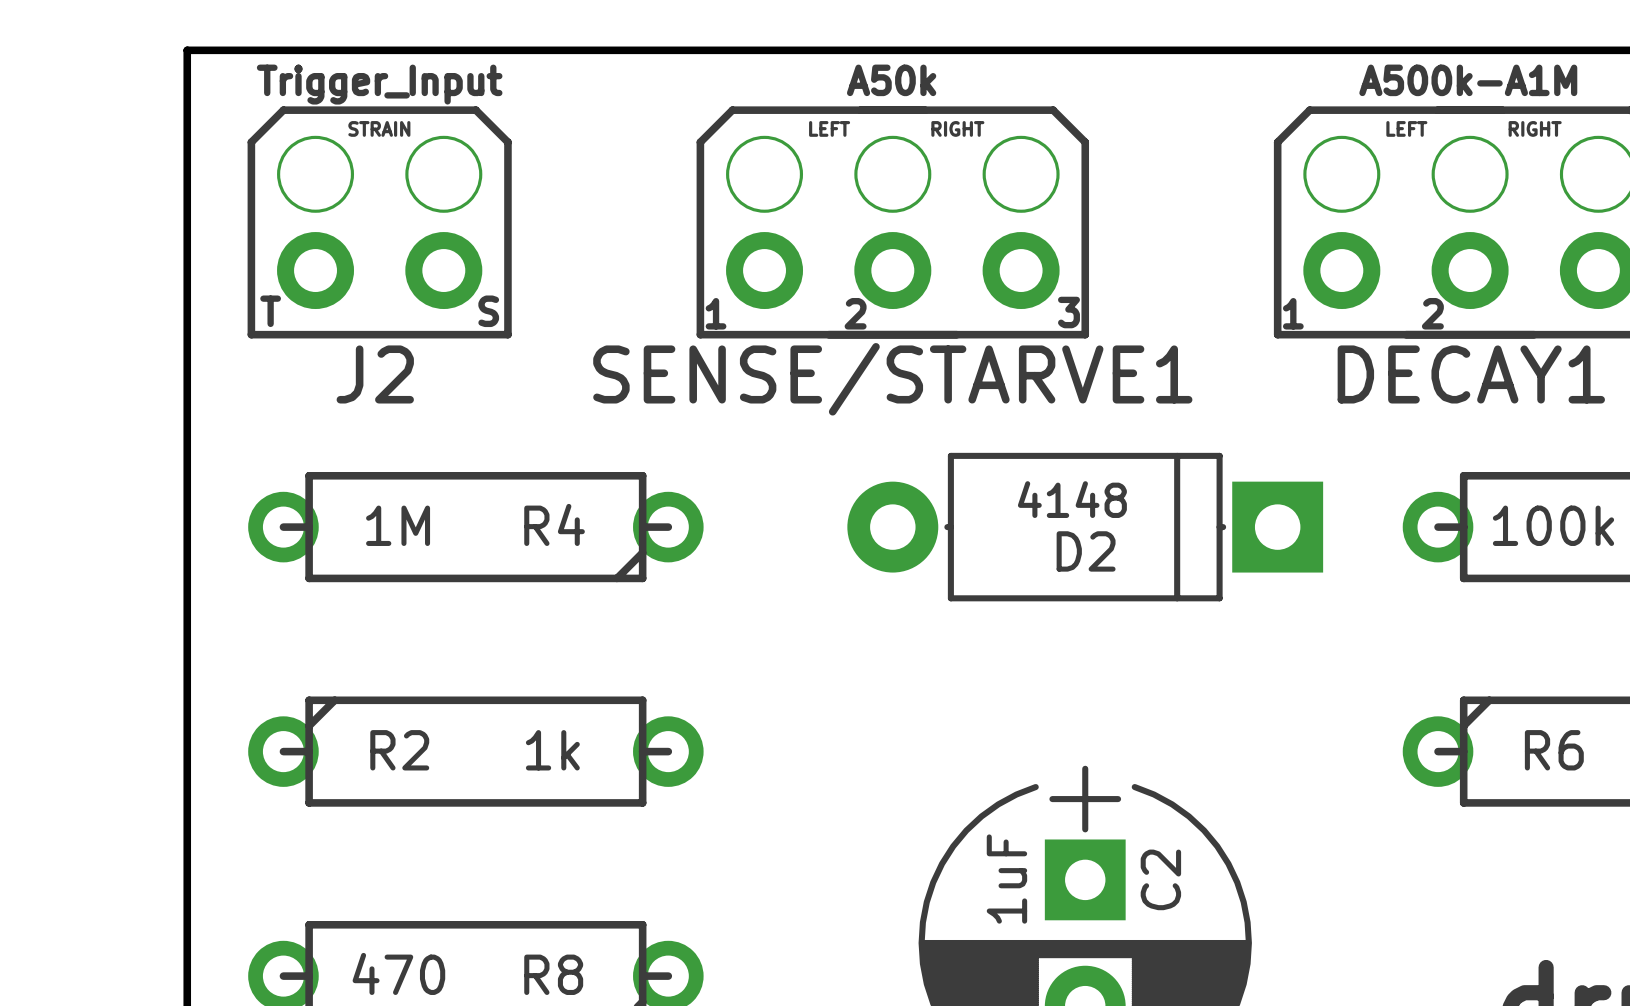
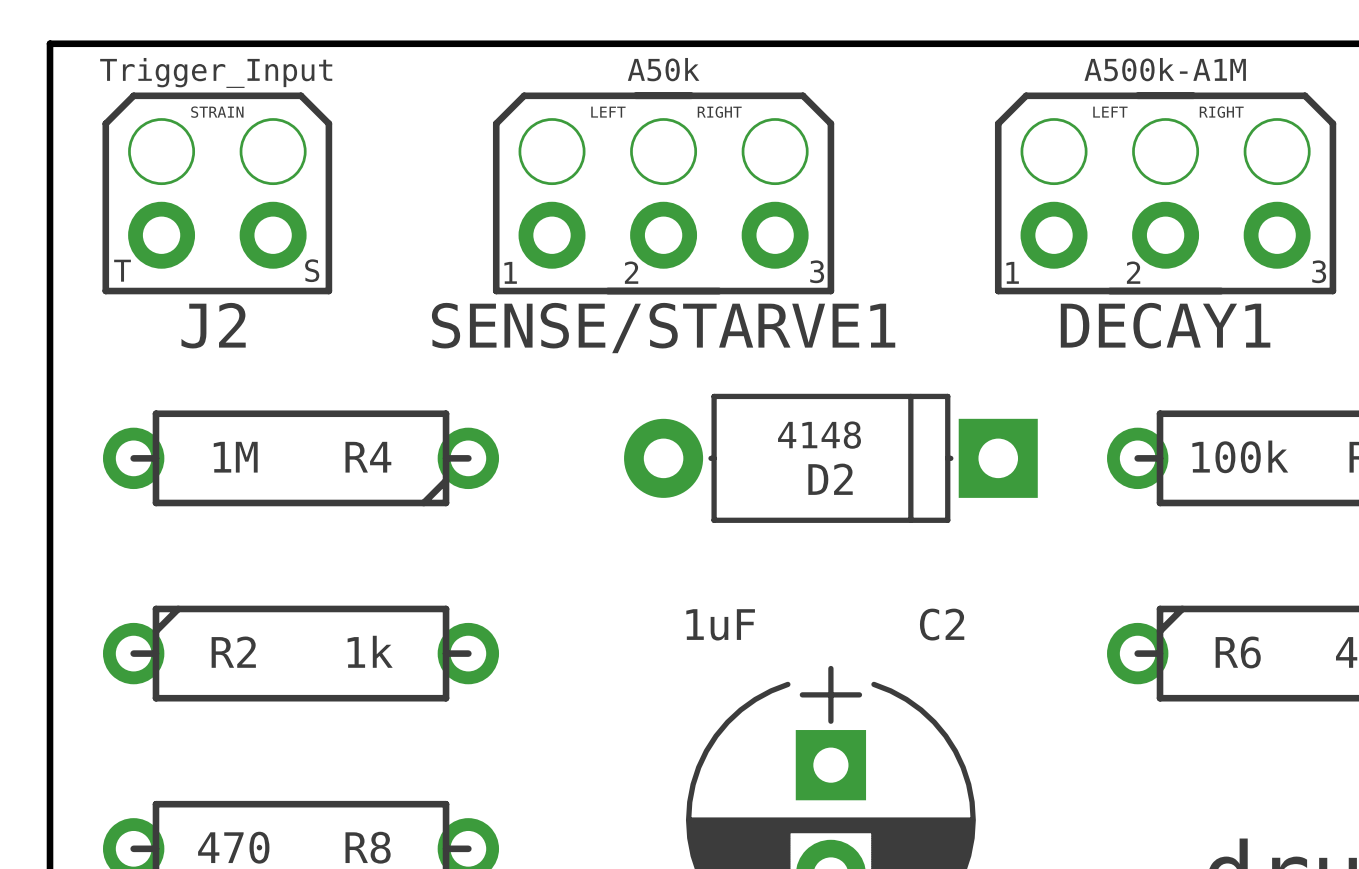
C2 value rotation: 0° (1006, 879) -> 90° clockwise (720, 624)
C2 value position: 1uF (1006, 879) -> 1uF (720, 624)
C2 name rotation: 0° (1160, 879) -> 90° clockwise (942, 624)
C2 name position: C2 (1160, 879) -> C2 (942, 624)

